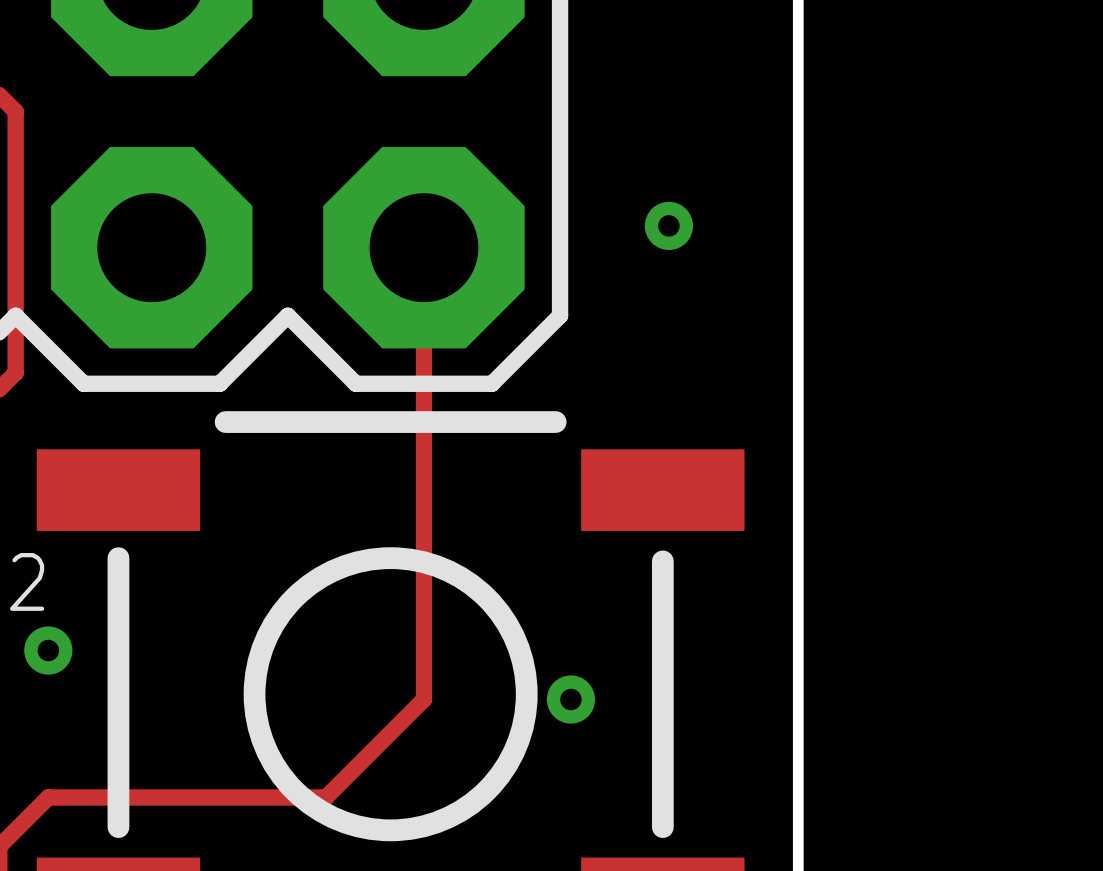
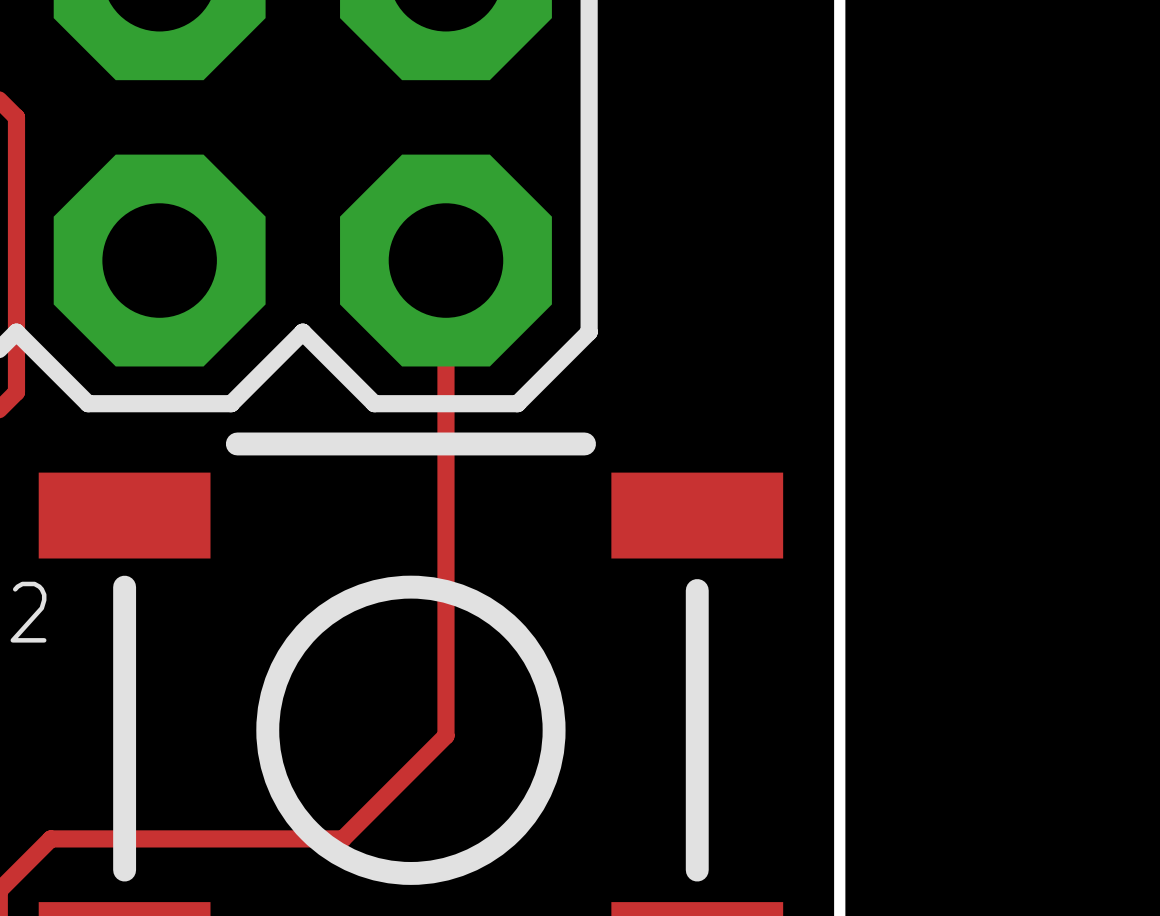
via: (668, 225) -> none
via: (48, 650) -> none
via: (570, 699) -> none

